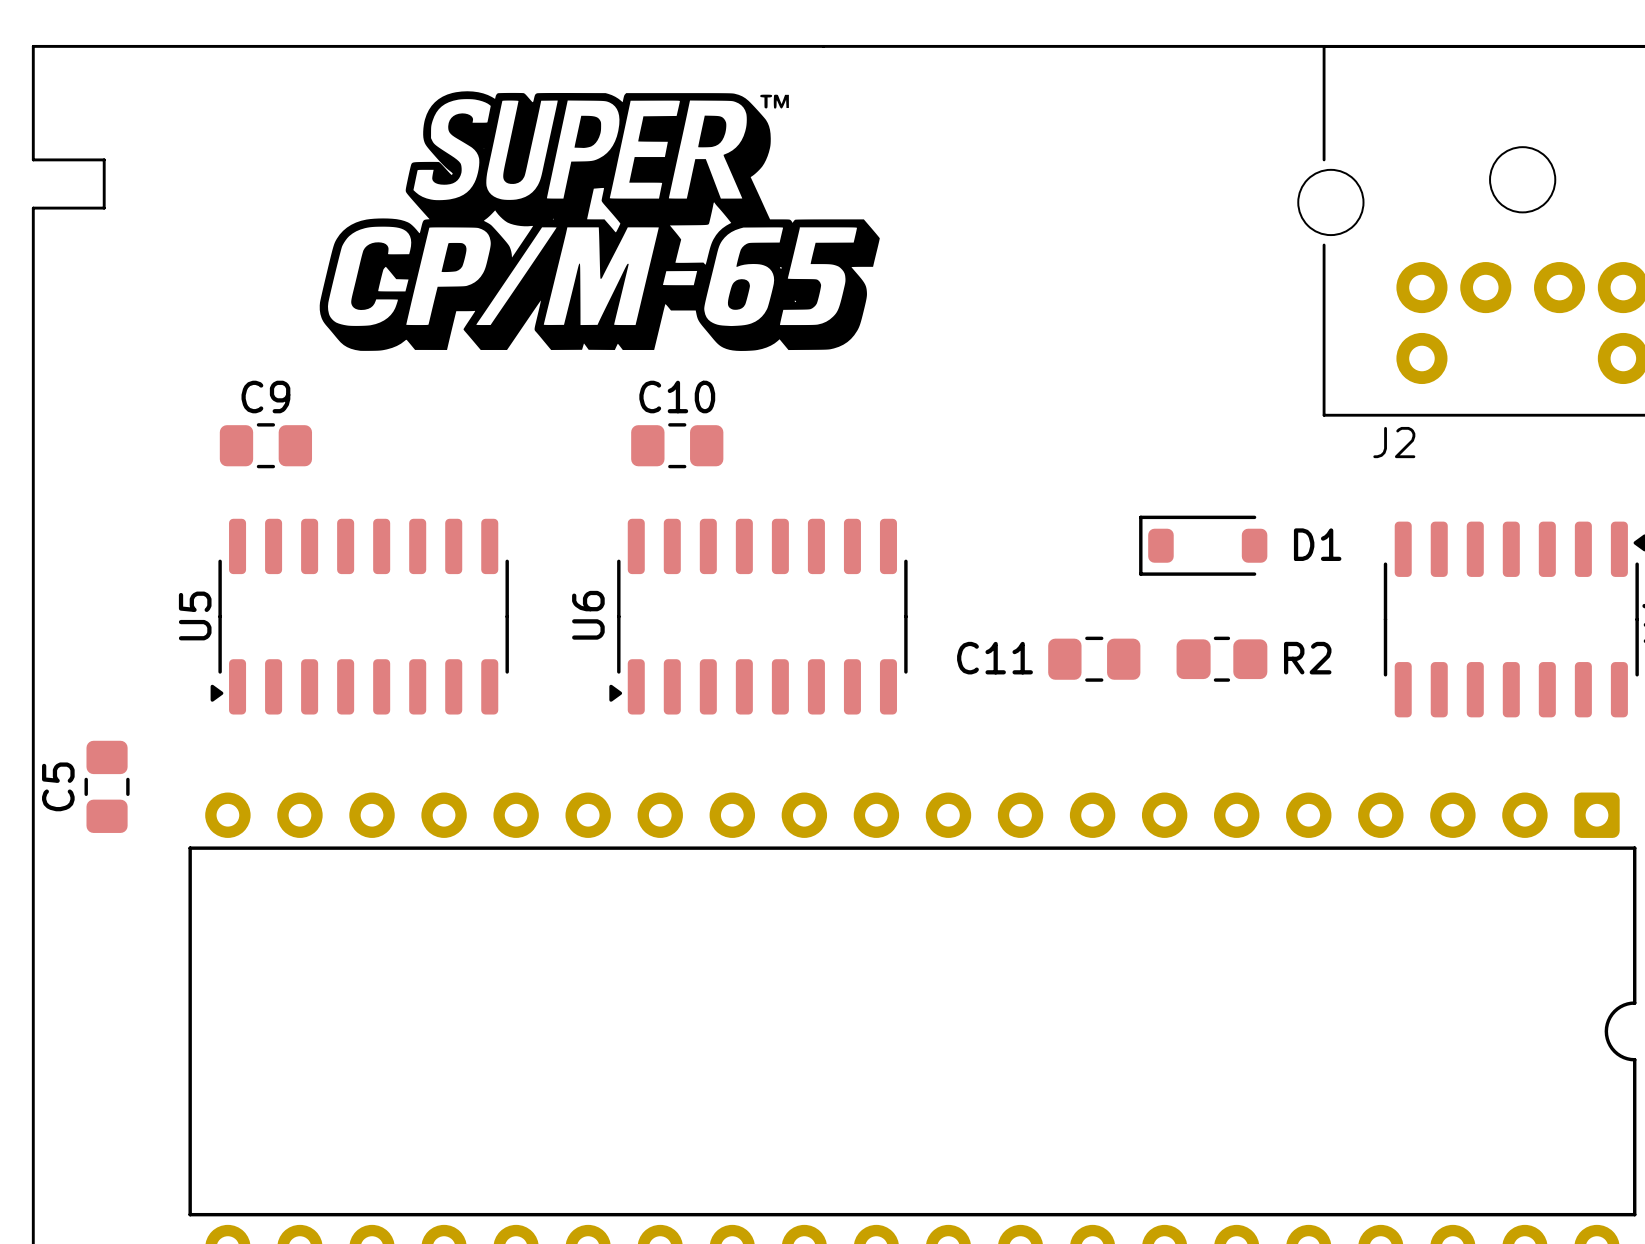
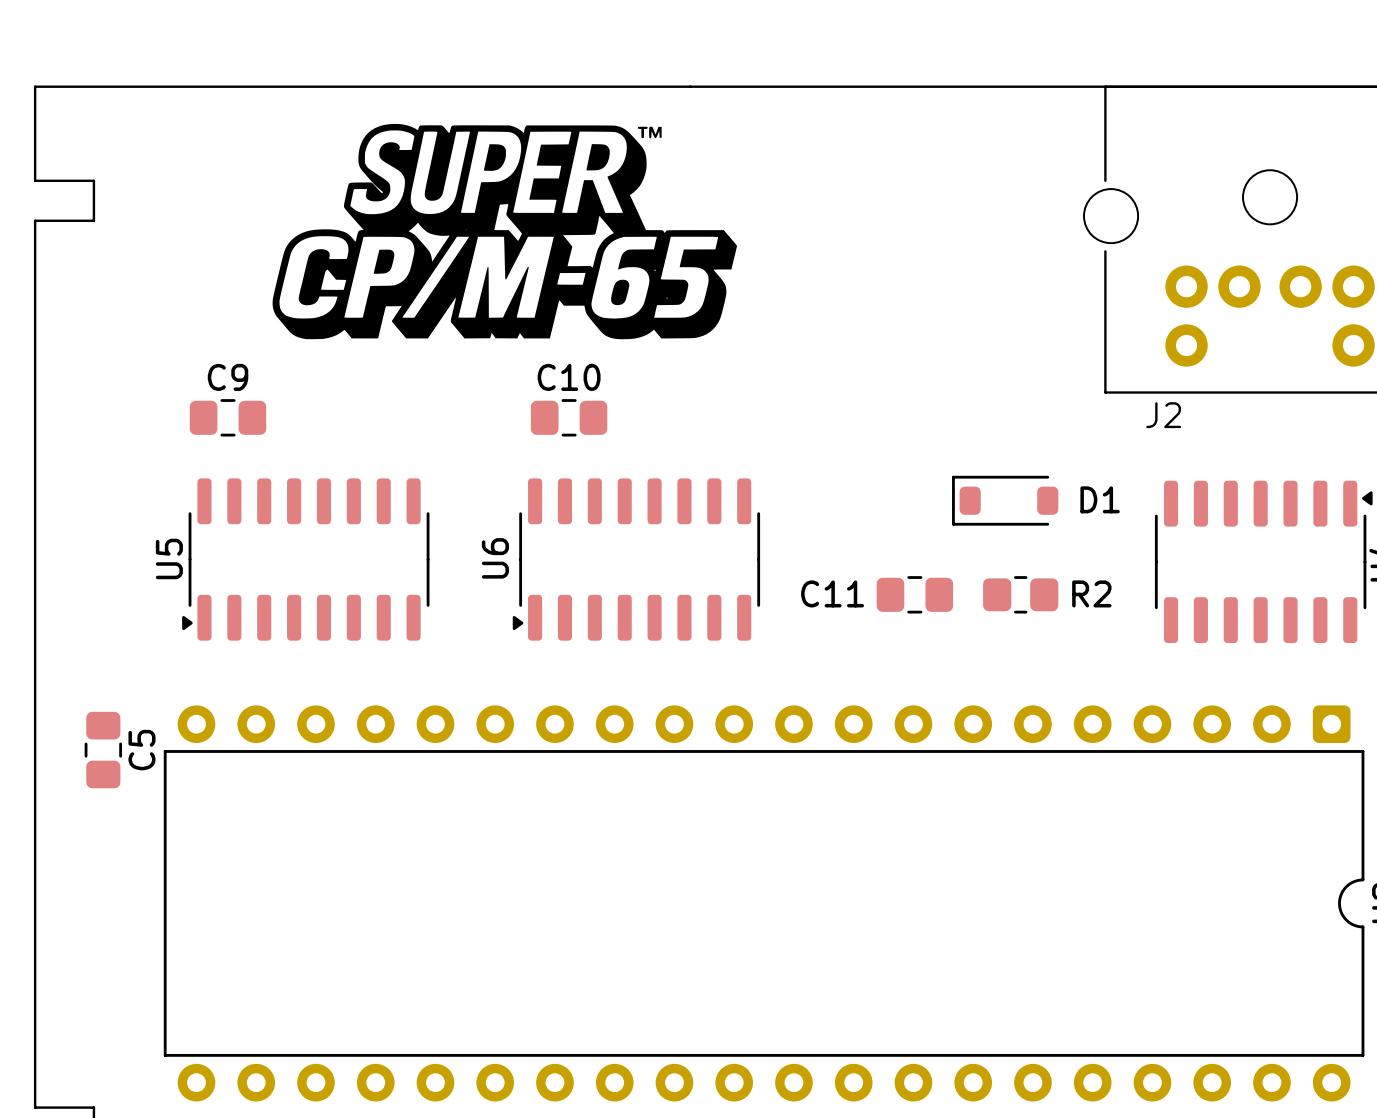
C5 name position: C5 (58, 786) -> C5 (141, 750)
C5 position: (107, 786) -> (103, 750)

